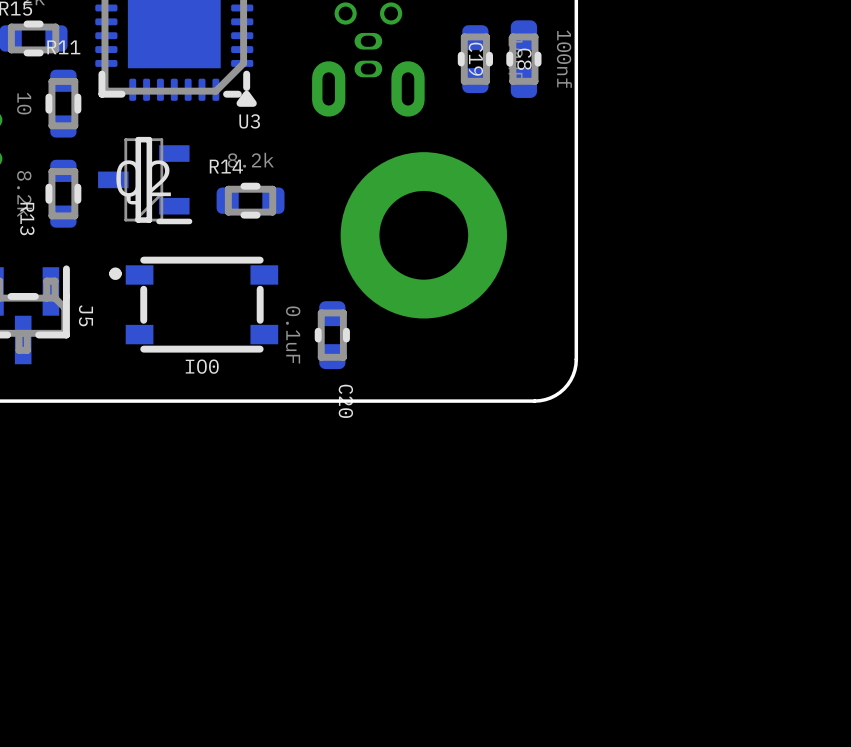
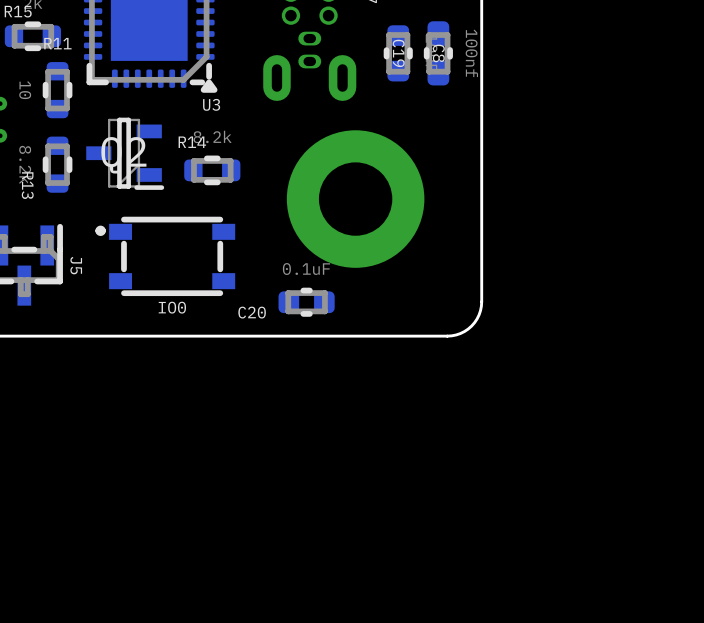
C20 rotation: 0° (332, 335) -> 90° clockwise (306, 302)
C20 position: (332, 335) -> (306, 302)

